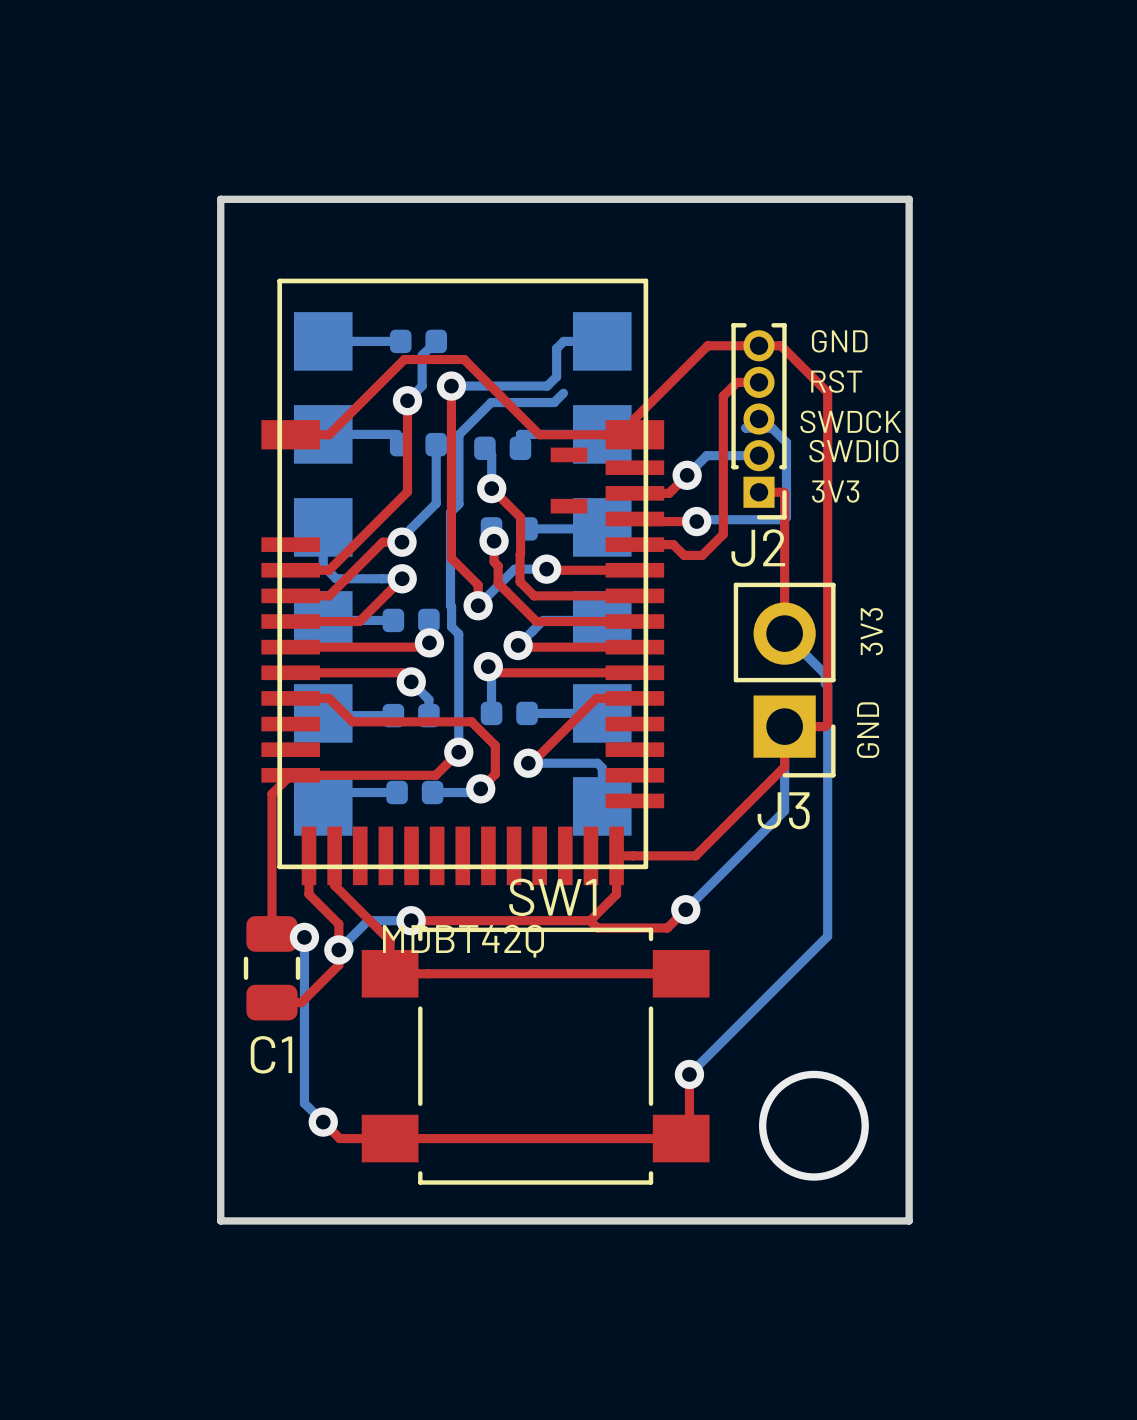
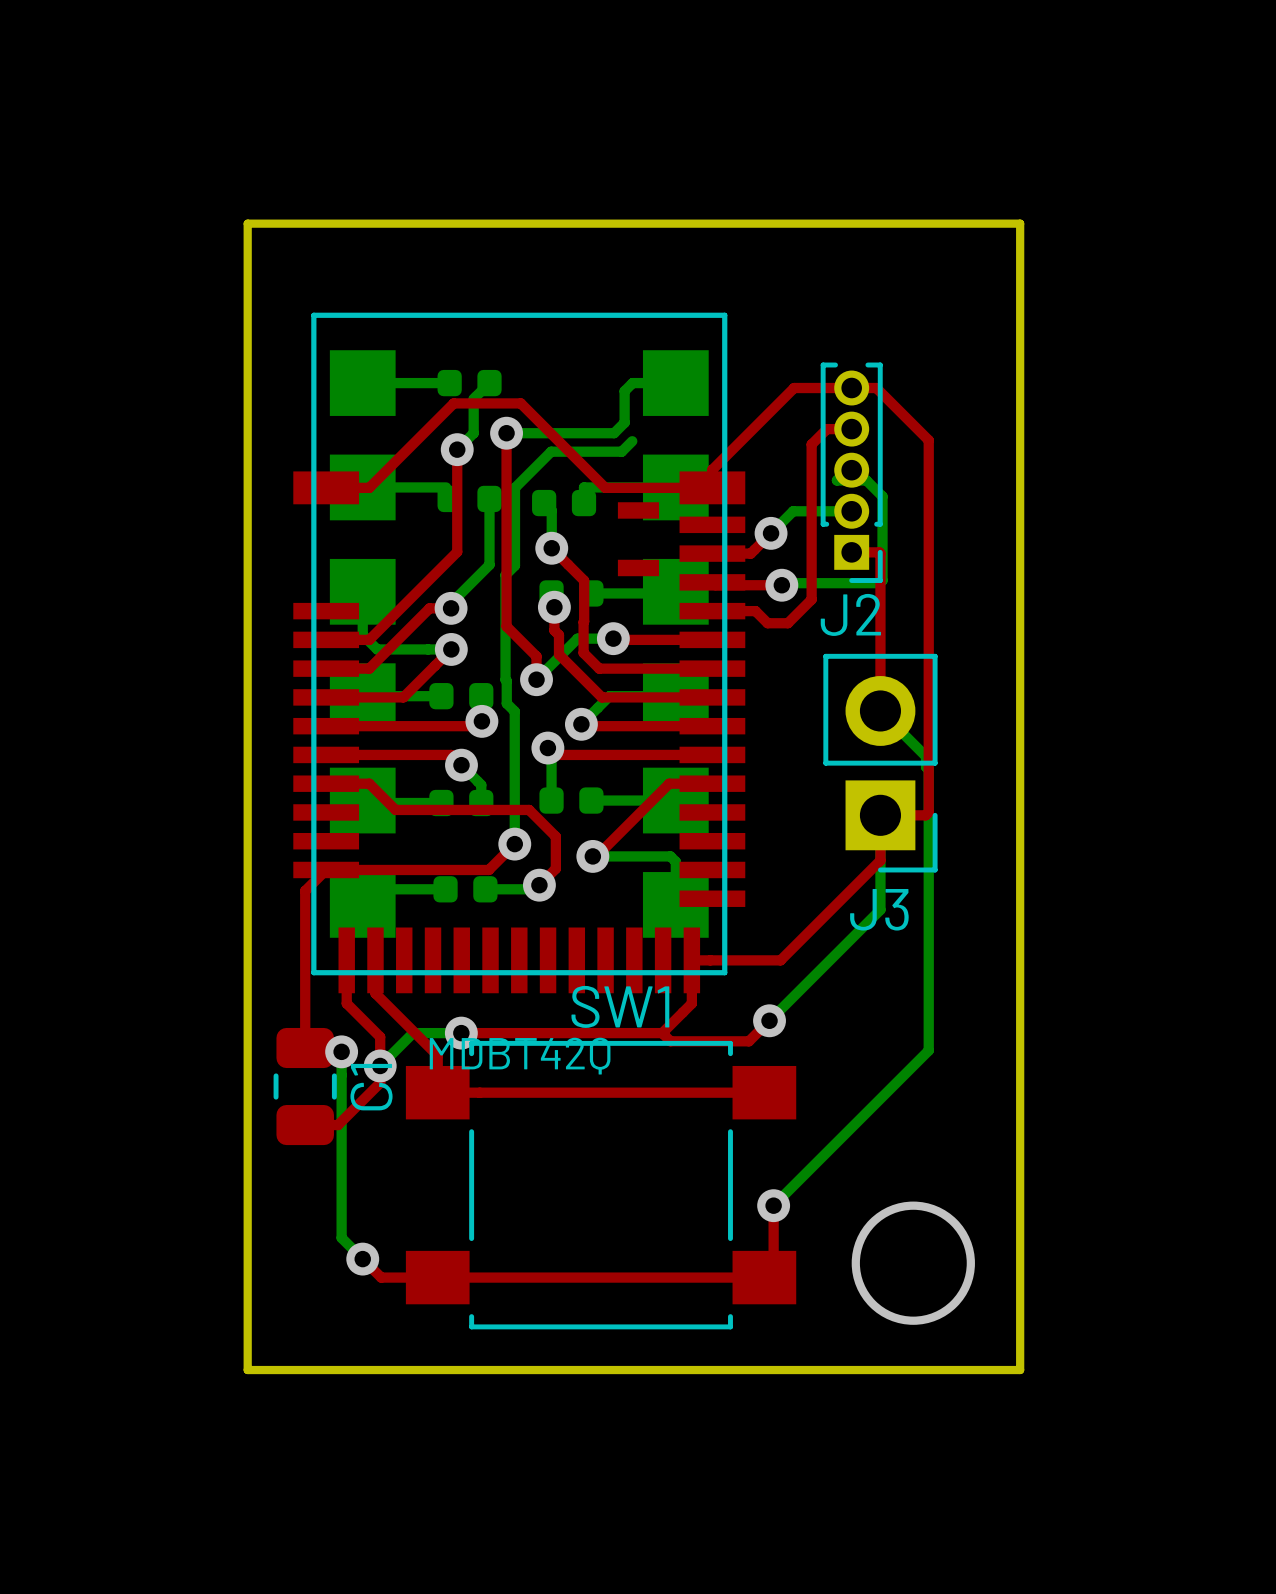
text: GND (839, 341) -> none
text: RST (836, 381) -> none
text: SWDCK (850, 421) -> none
text: SWDIO (853, 451) -> none
text: 3V3 (835, 491) -> none
text: 3V3 (871, 631) -> none
text: GND (868, 730) -> none
C1 name rotation: 0° (271, 1054) -> 90° counterclockwise (371, 1087)
C1 name position: C1 (271, 1054) -> C1 (371, 1087)

